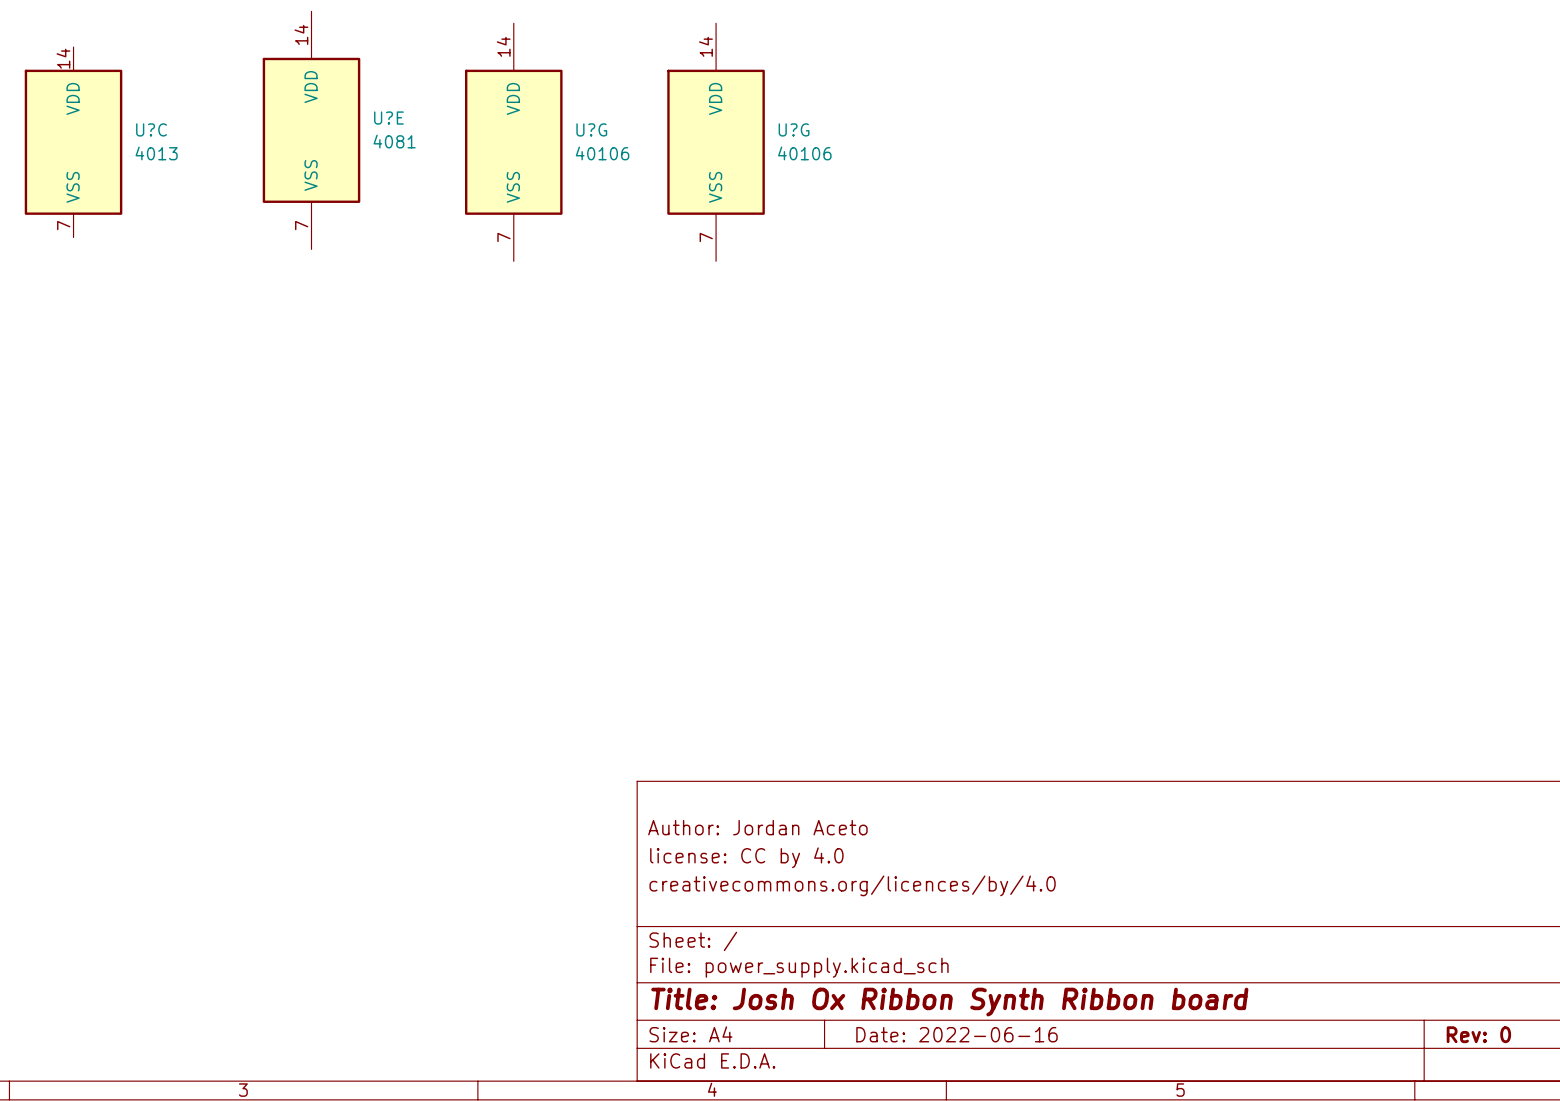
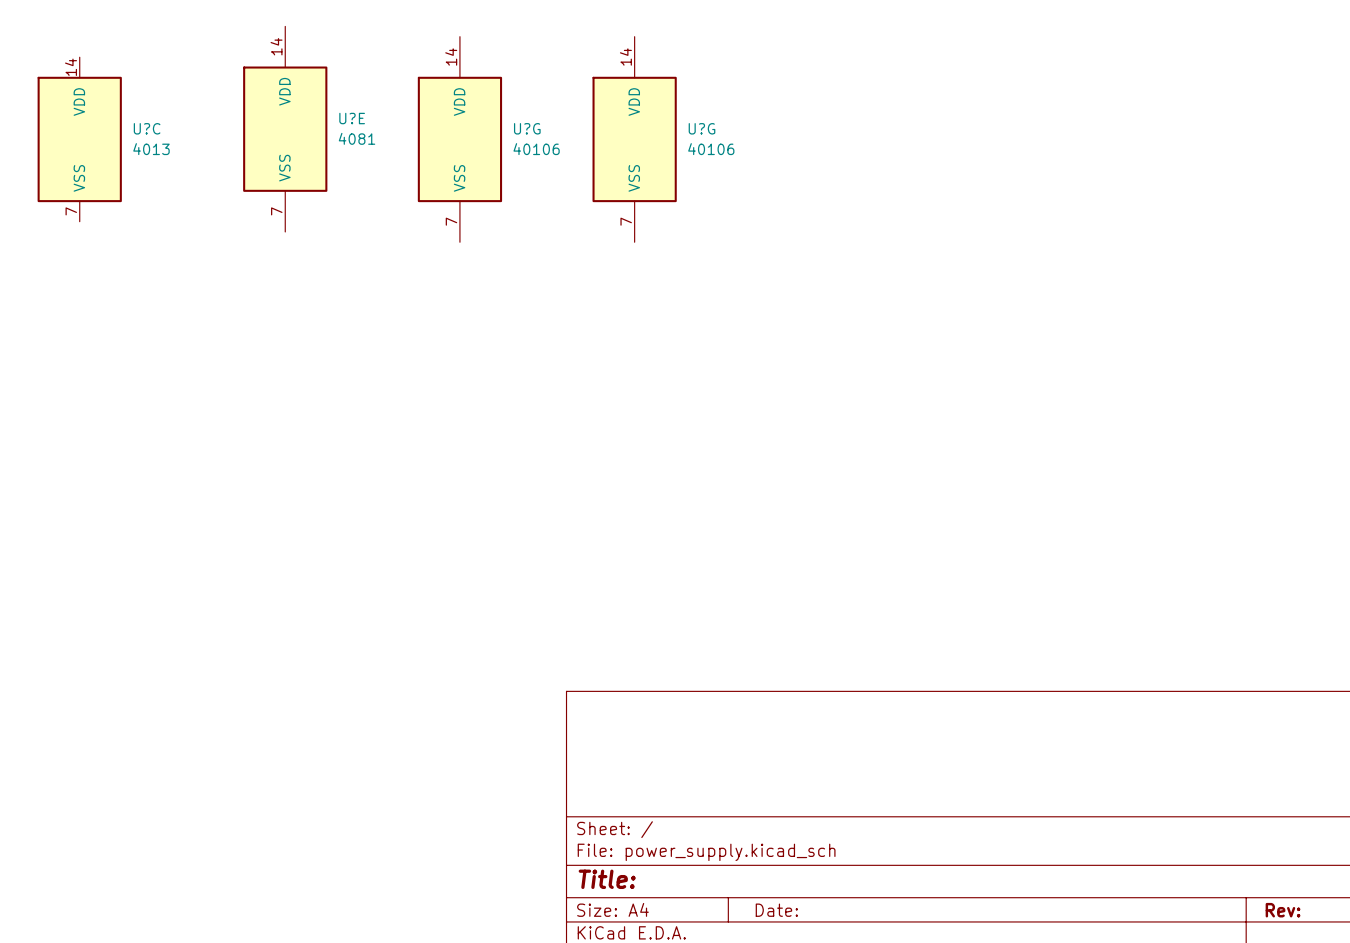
title block: Author: Jordan Aceto (757, 827) -> none
title block: license: CC by 4.0 (746, 857) -> none
title block: creativecommons.org/licences/by/4.0 (852, 885) -> none
title block: Title: Josh Ox Ribbon Synth Ribbon board (949, 1002) -> Title: (607, 879)
title block: Date: 2022-06-16 (956, 1034) -> Date: (776, 910)
title block: Rev: 0 (1478, 1034) -> Rev: (1283, 910)

